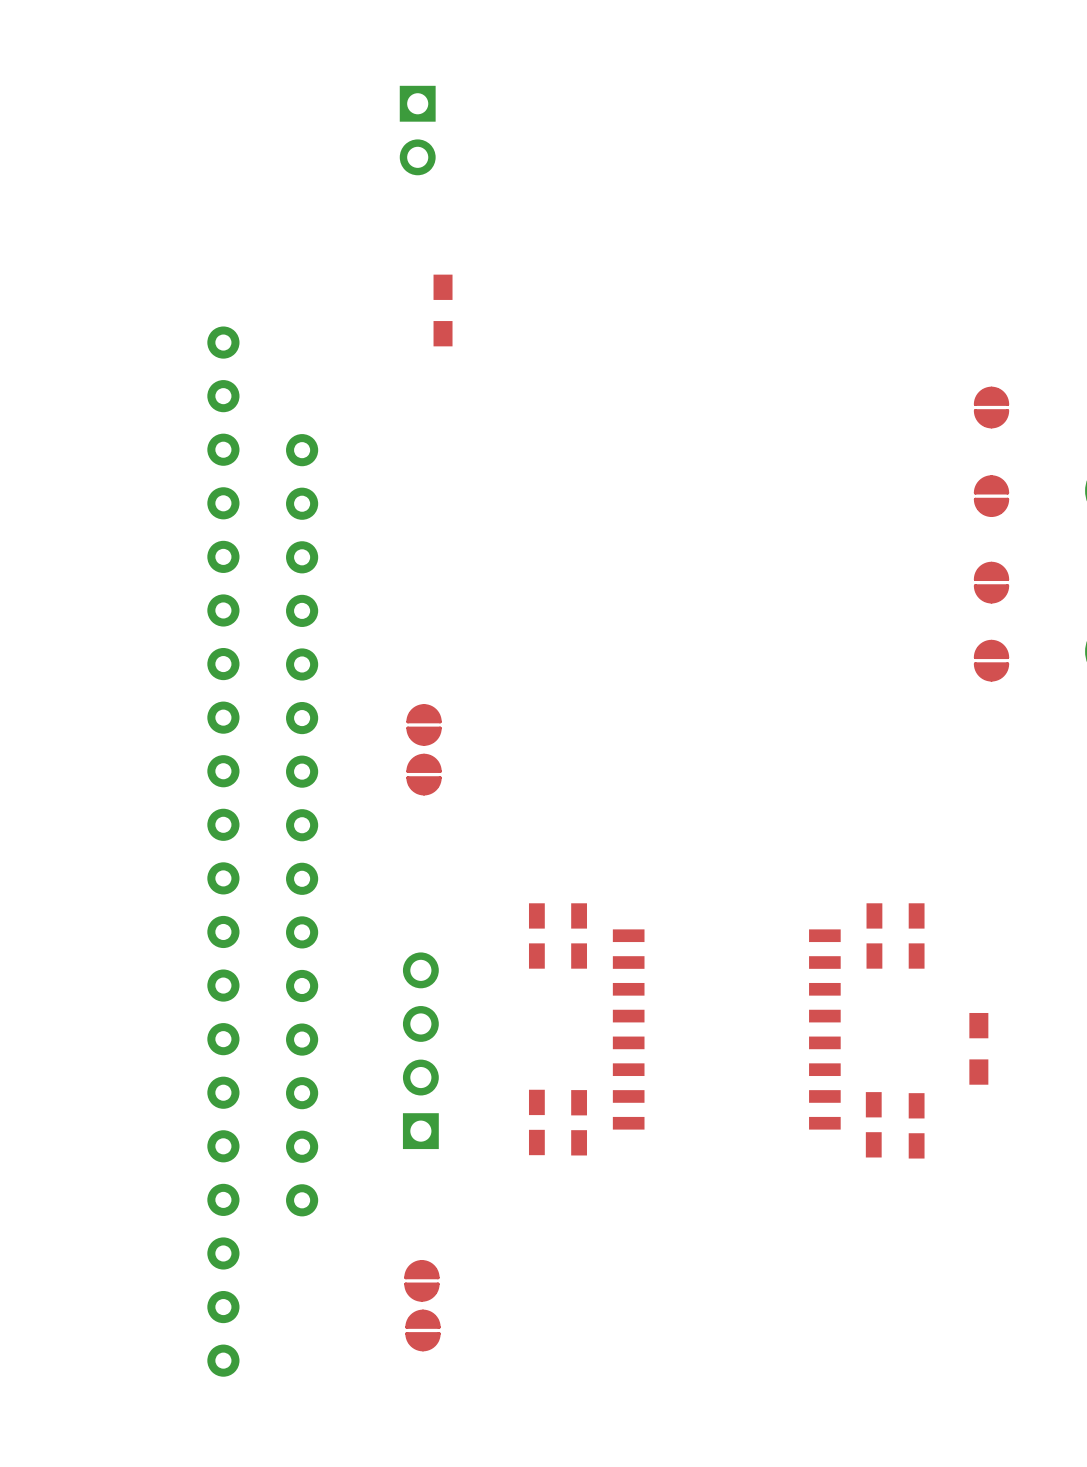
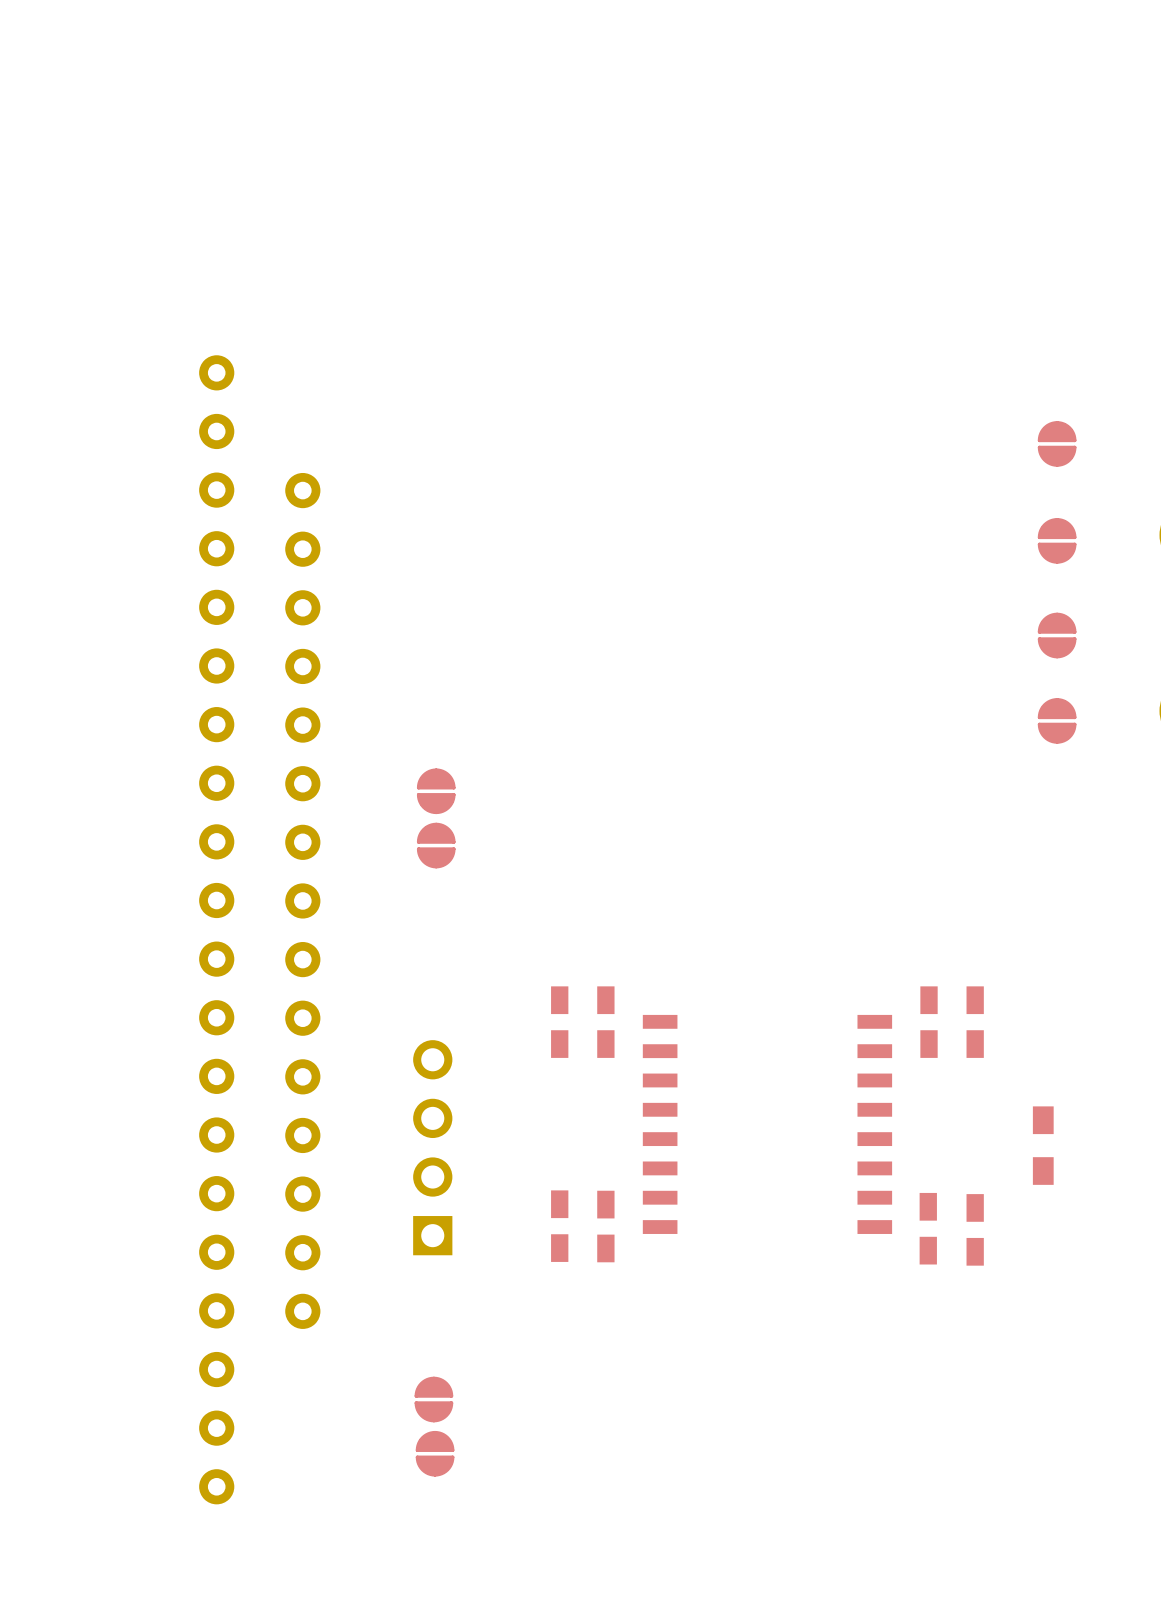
part: (417, 130) -> none
part: (443, 310) -> none

